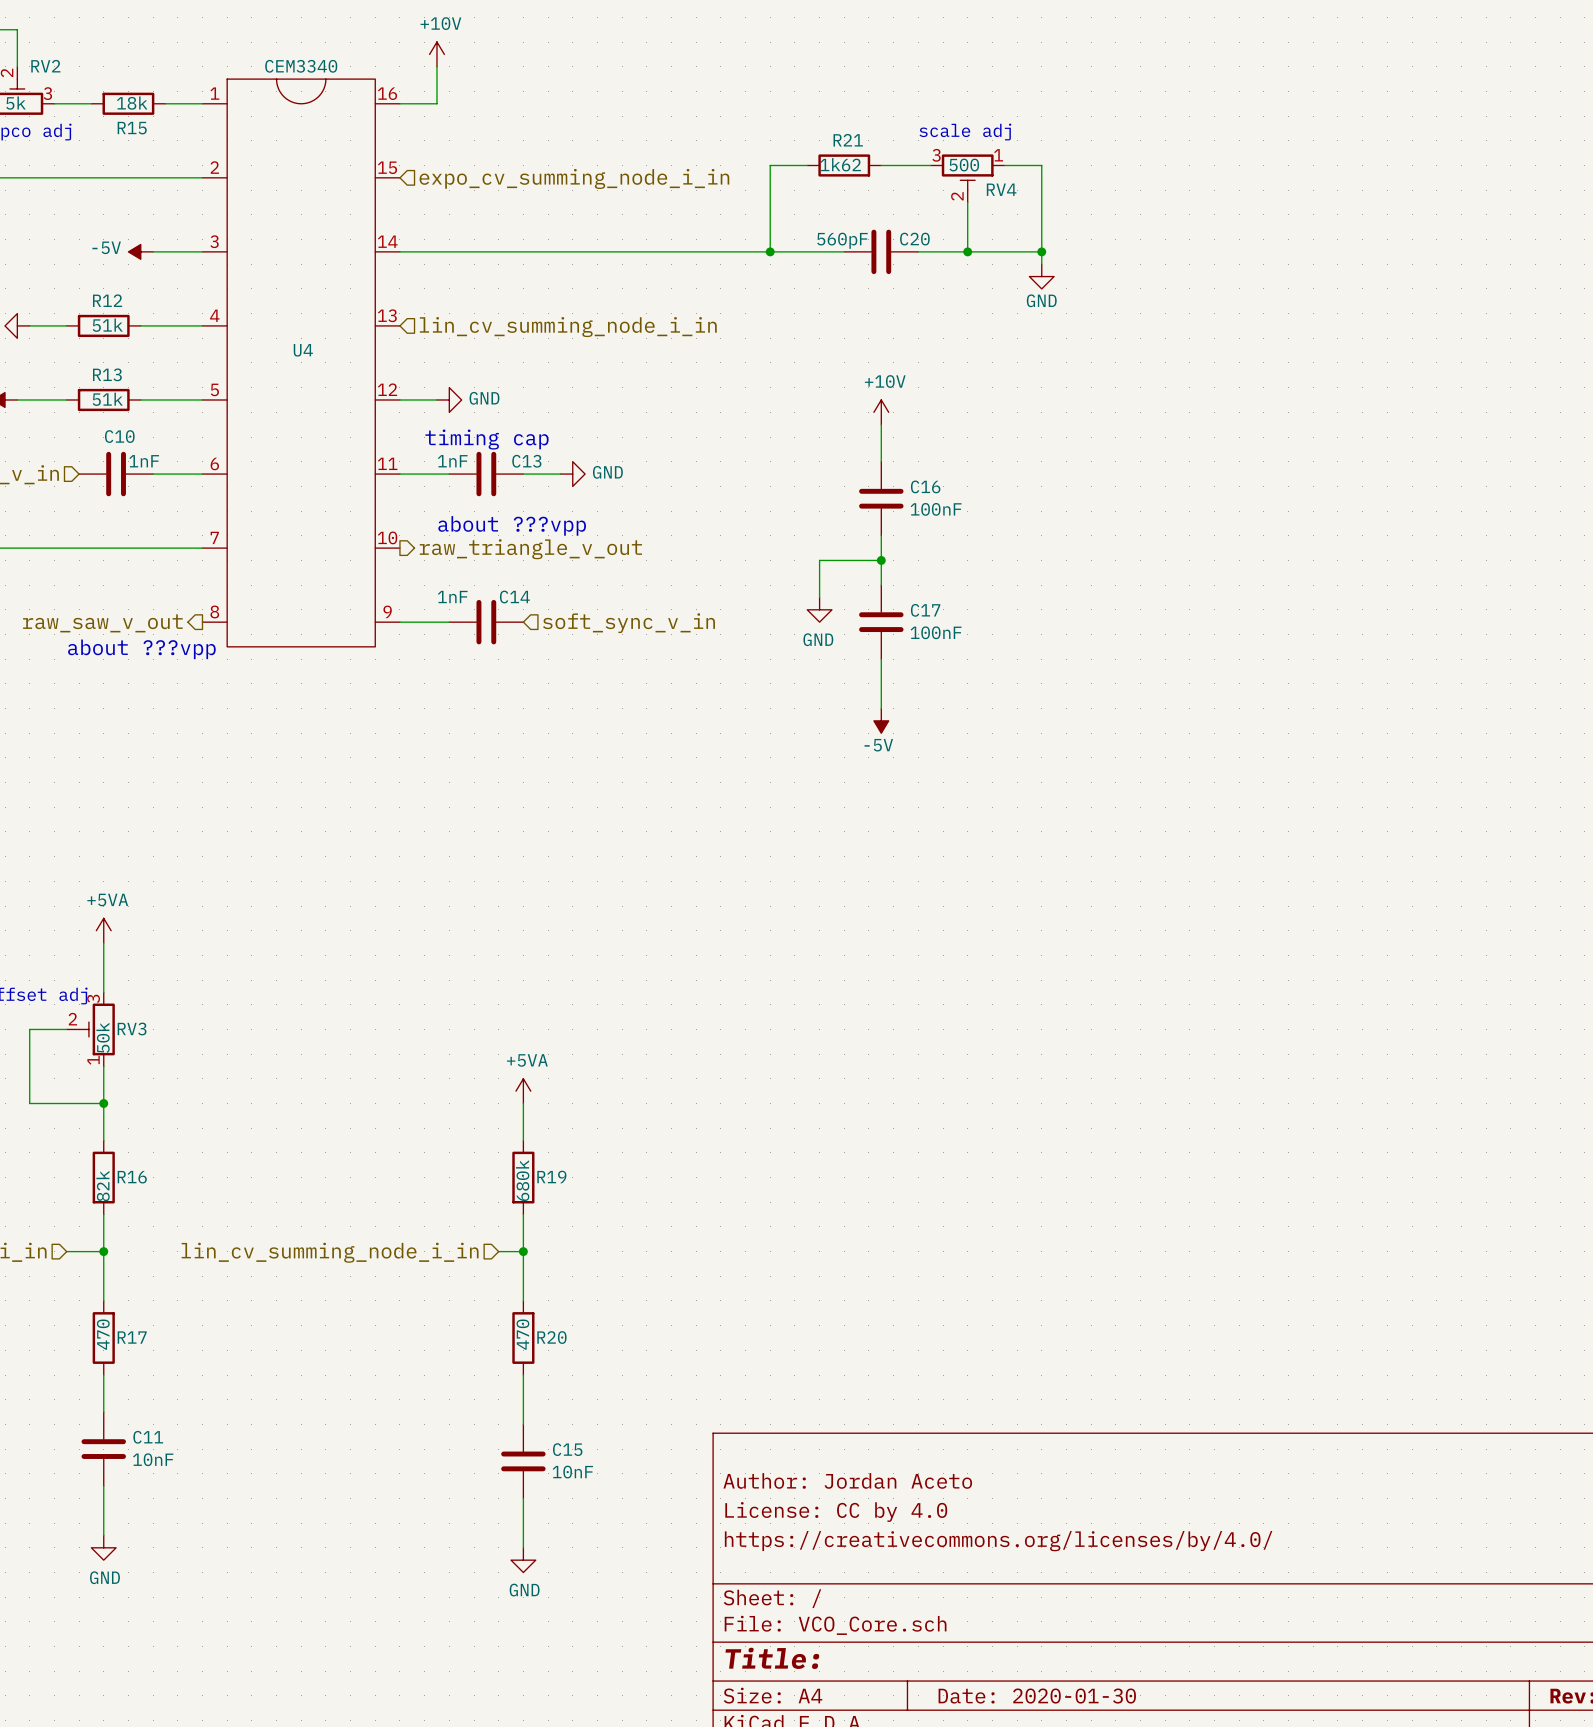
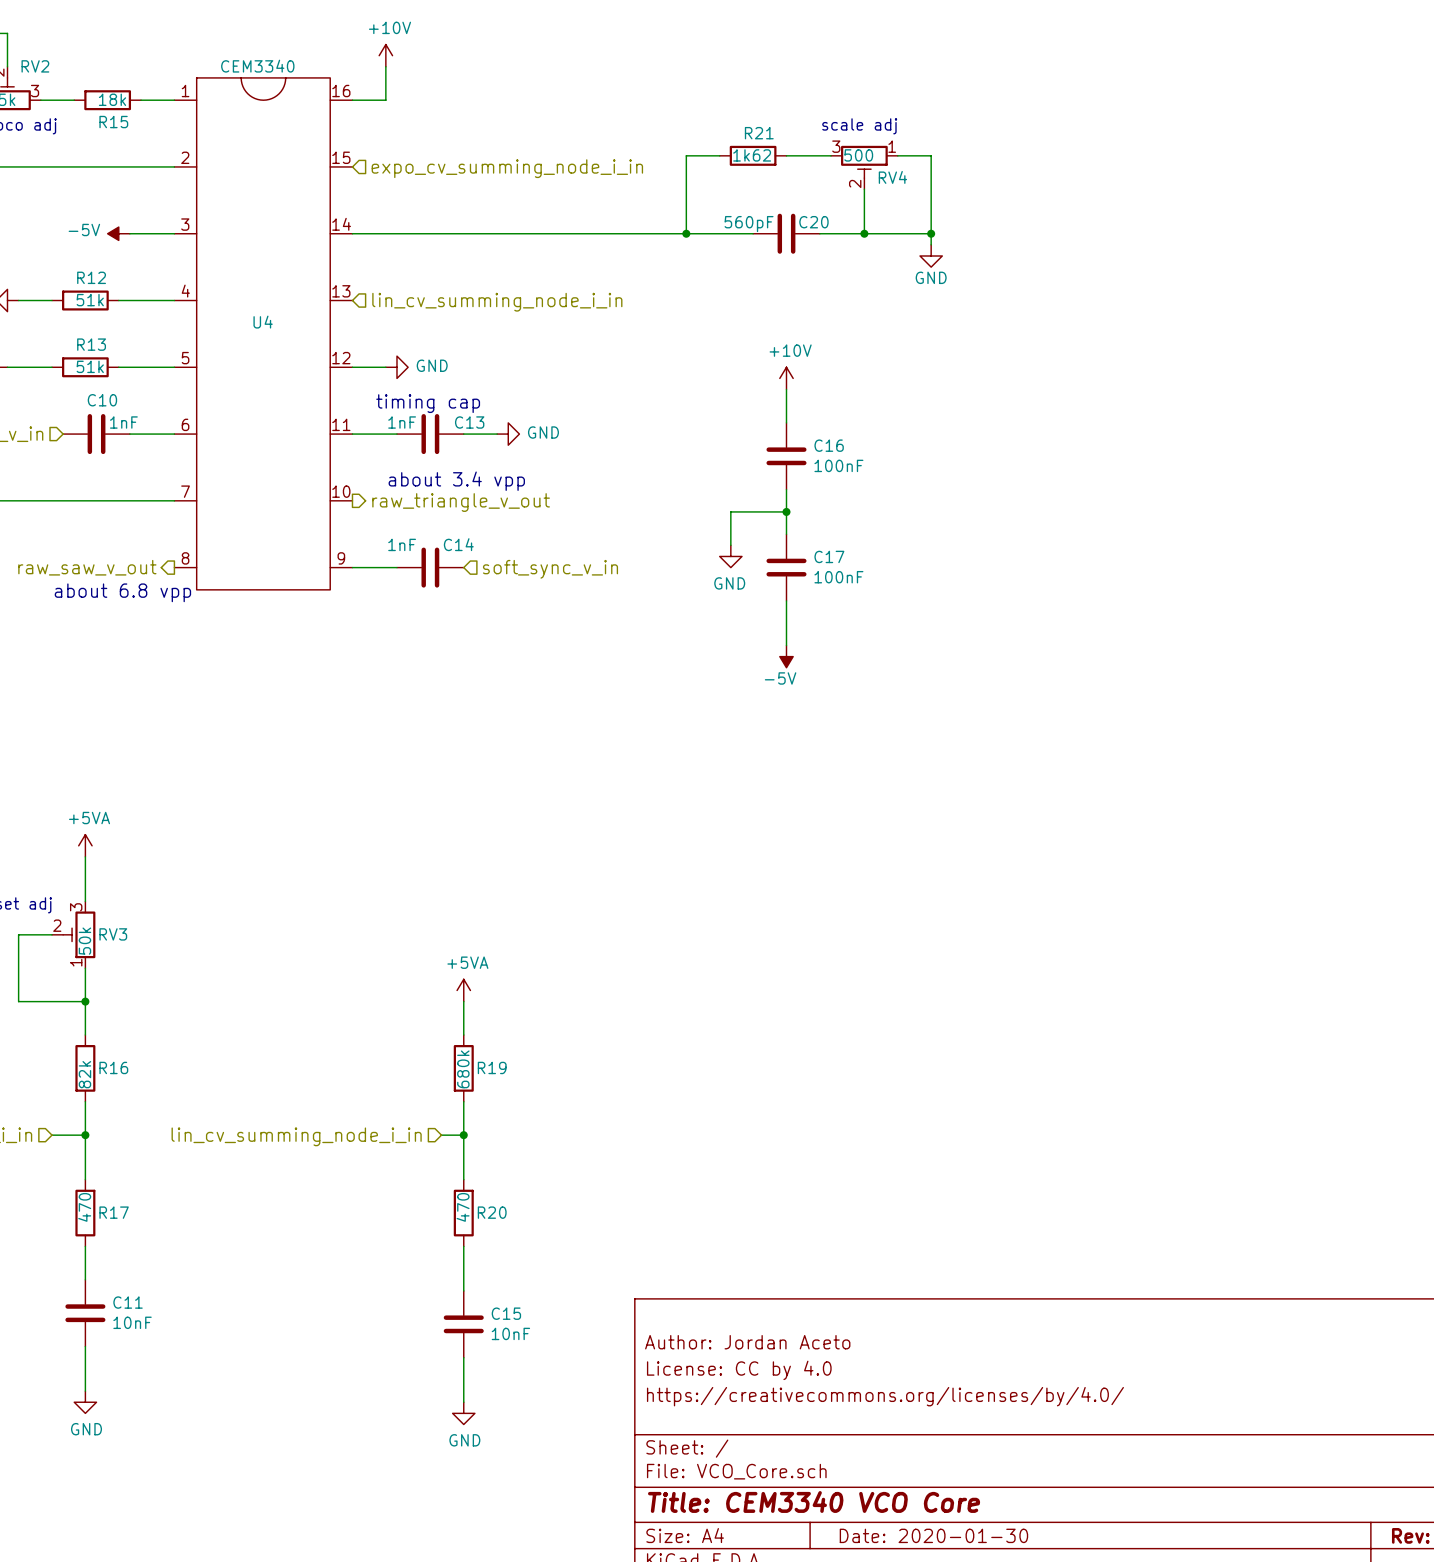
text: about ???vpp (512, 525) -> about 3.4 vpp (456, 481)
text: about ???vpp (141, 649) -> about 6.8 vpp (122, 592)
title block: Title: (772, 1658) -> Title: CEM3340 VCO Core (814, 1502)

